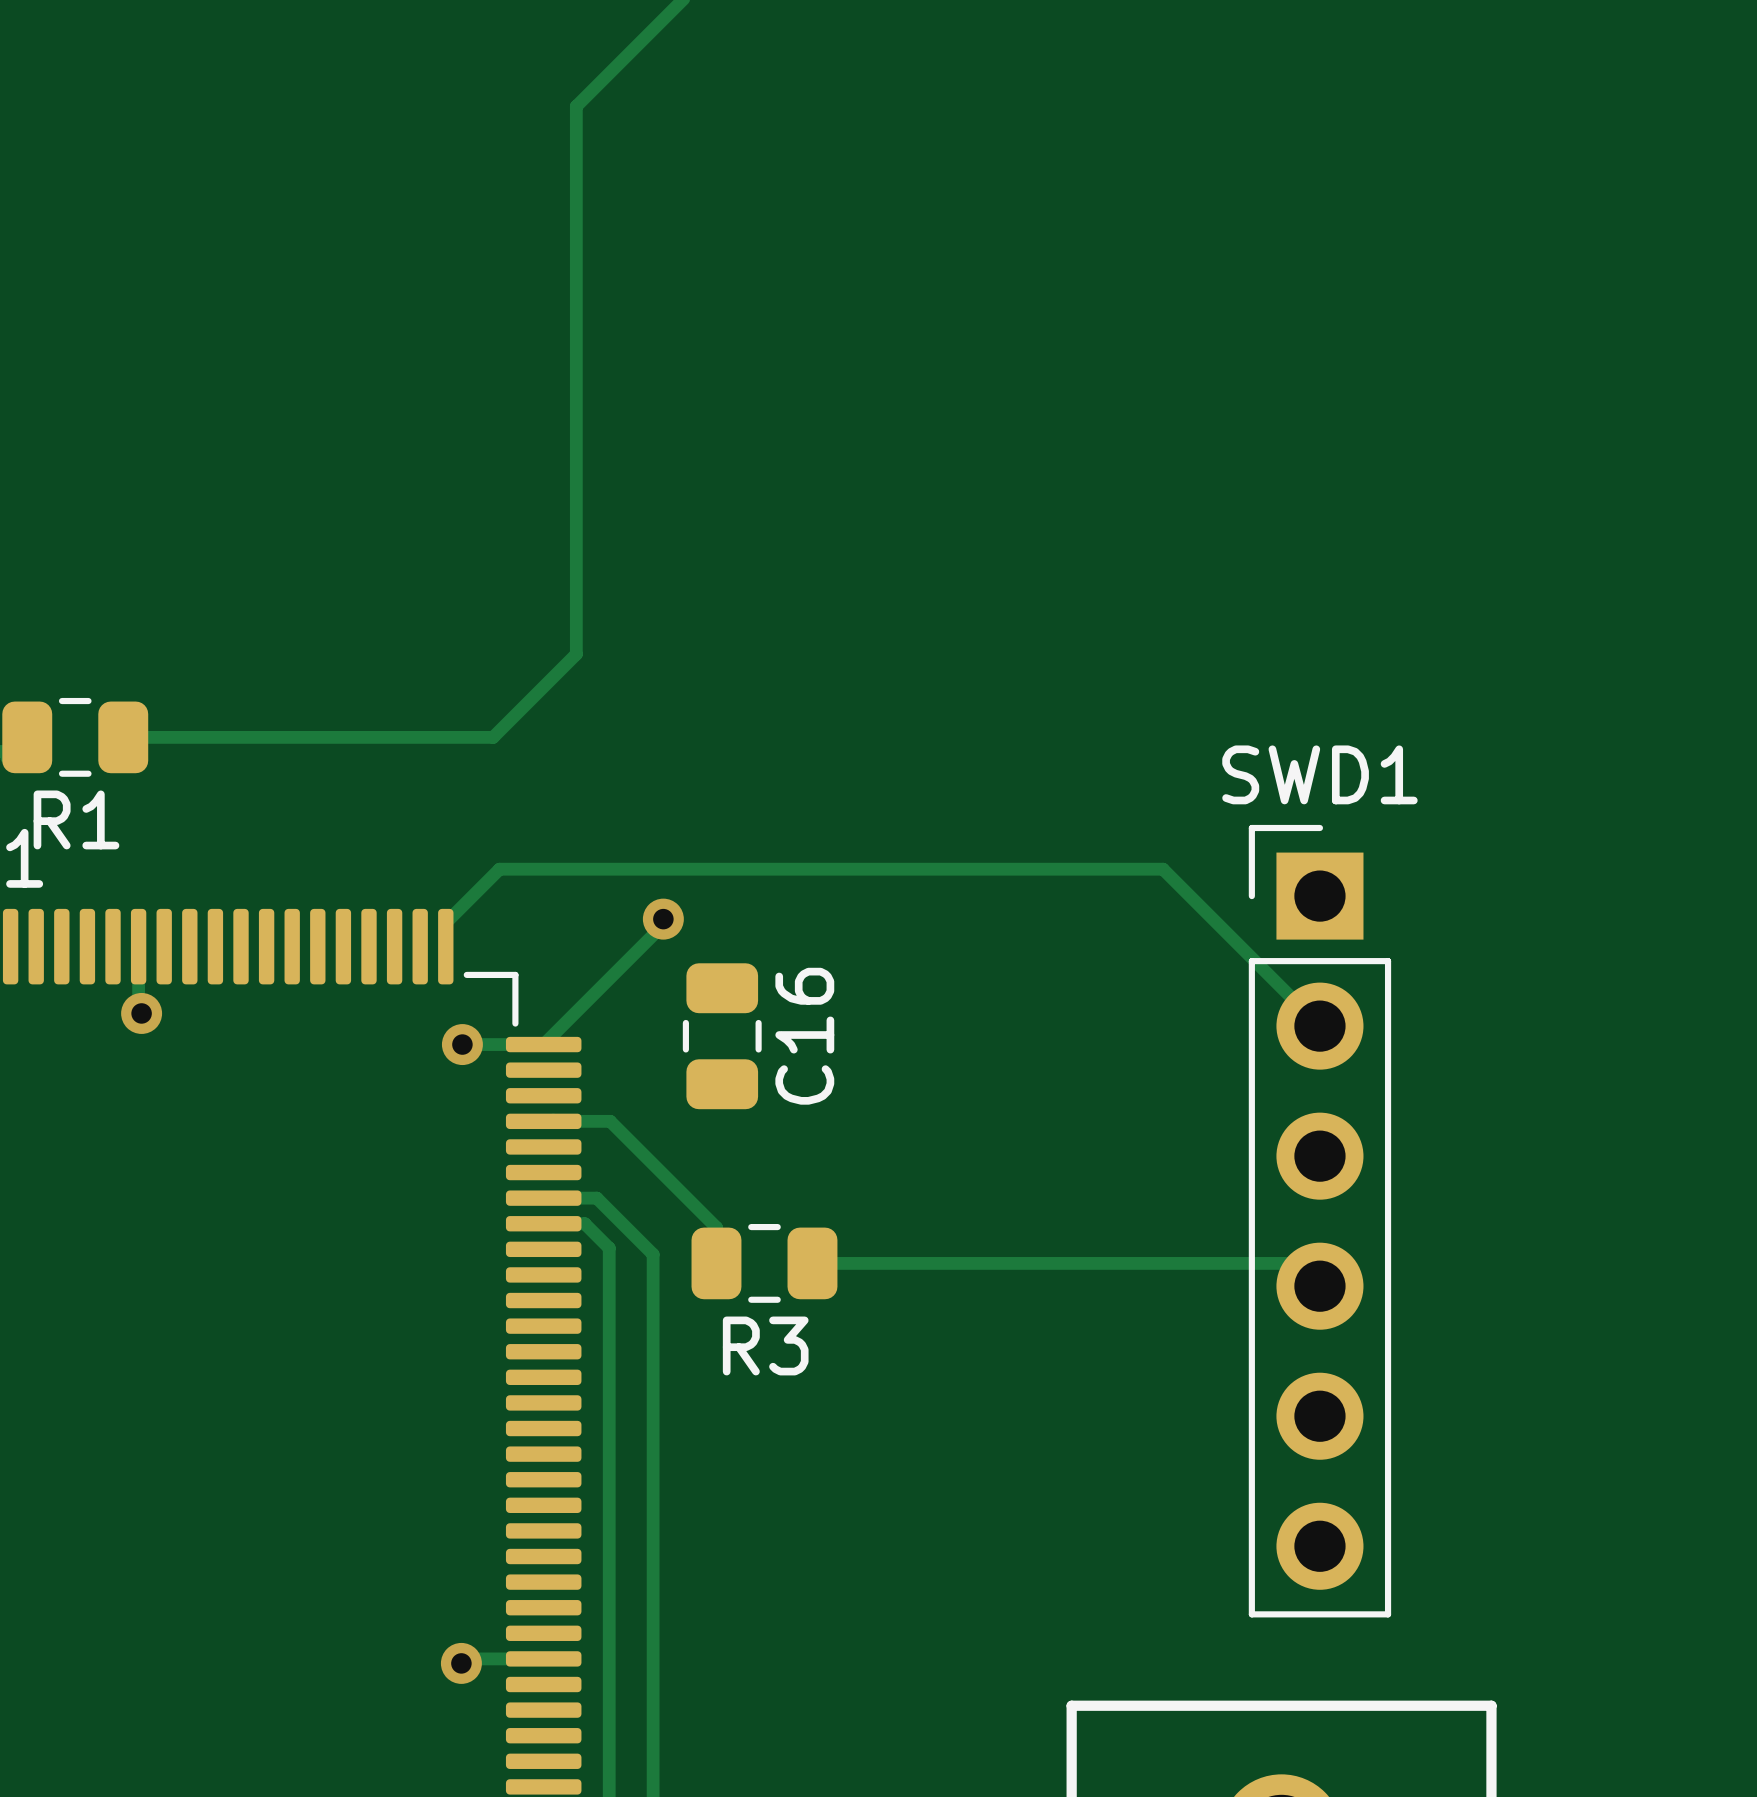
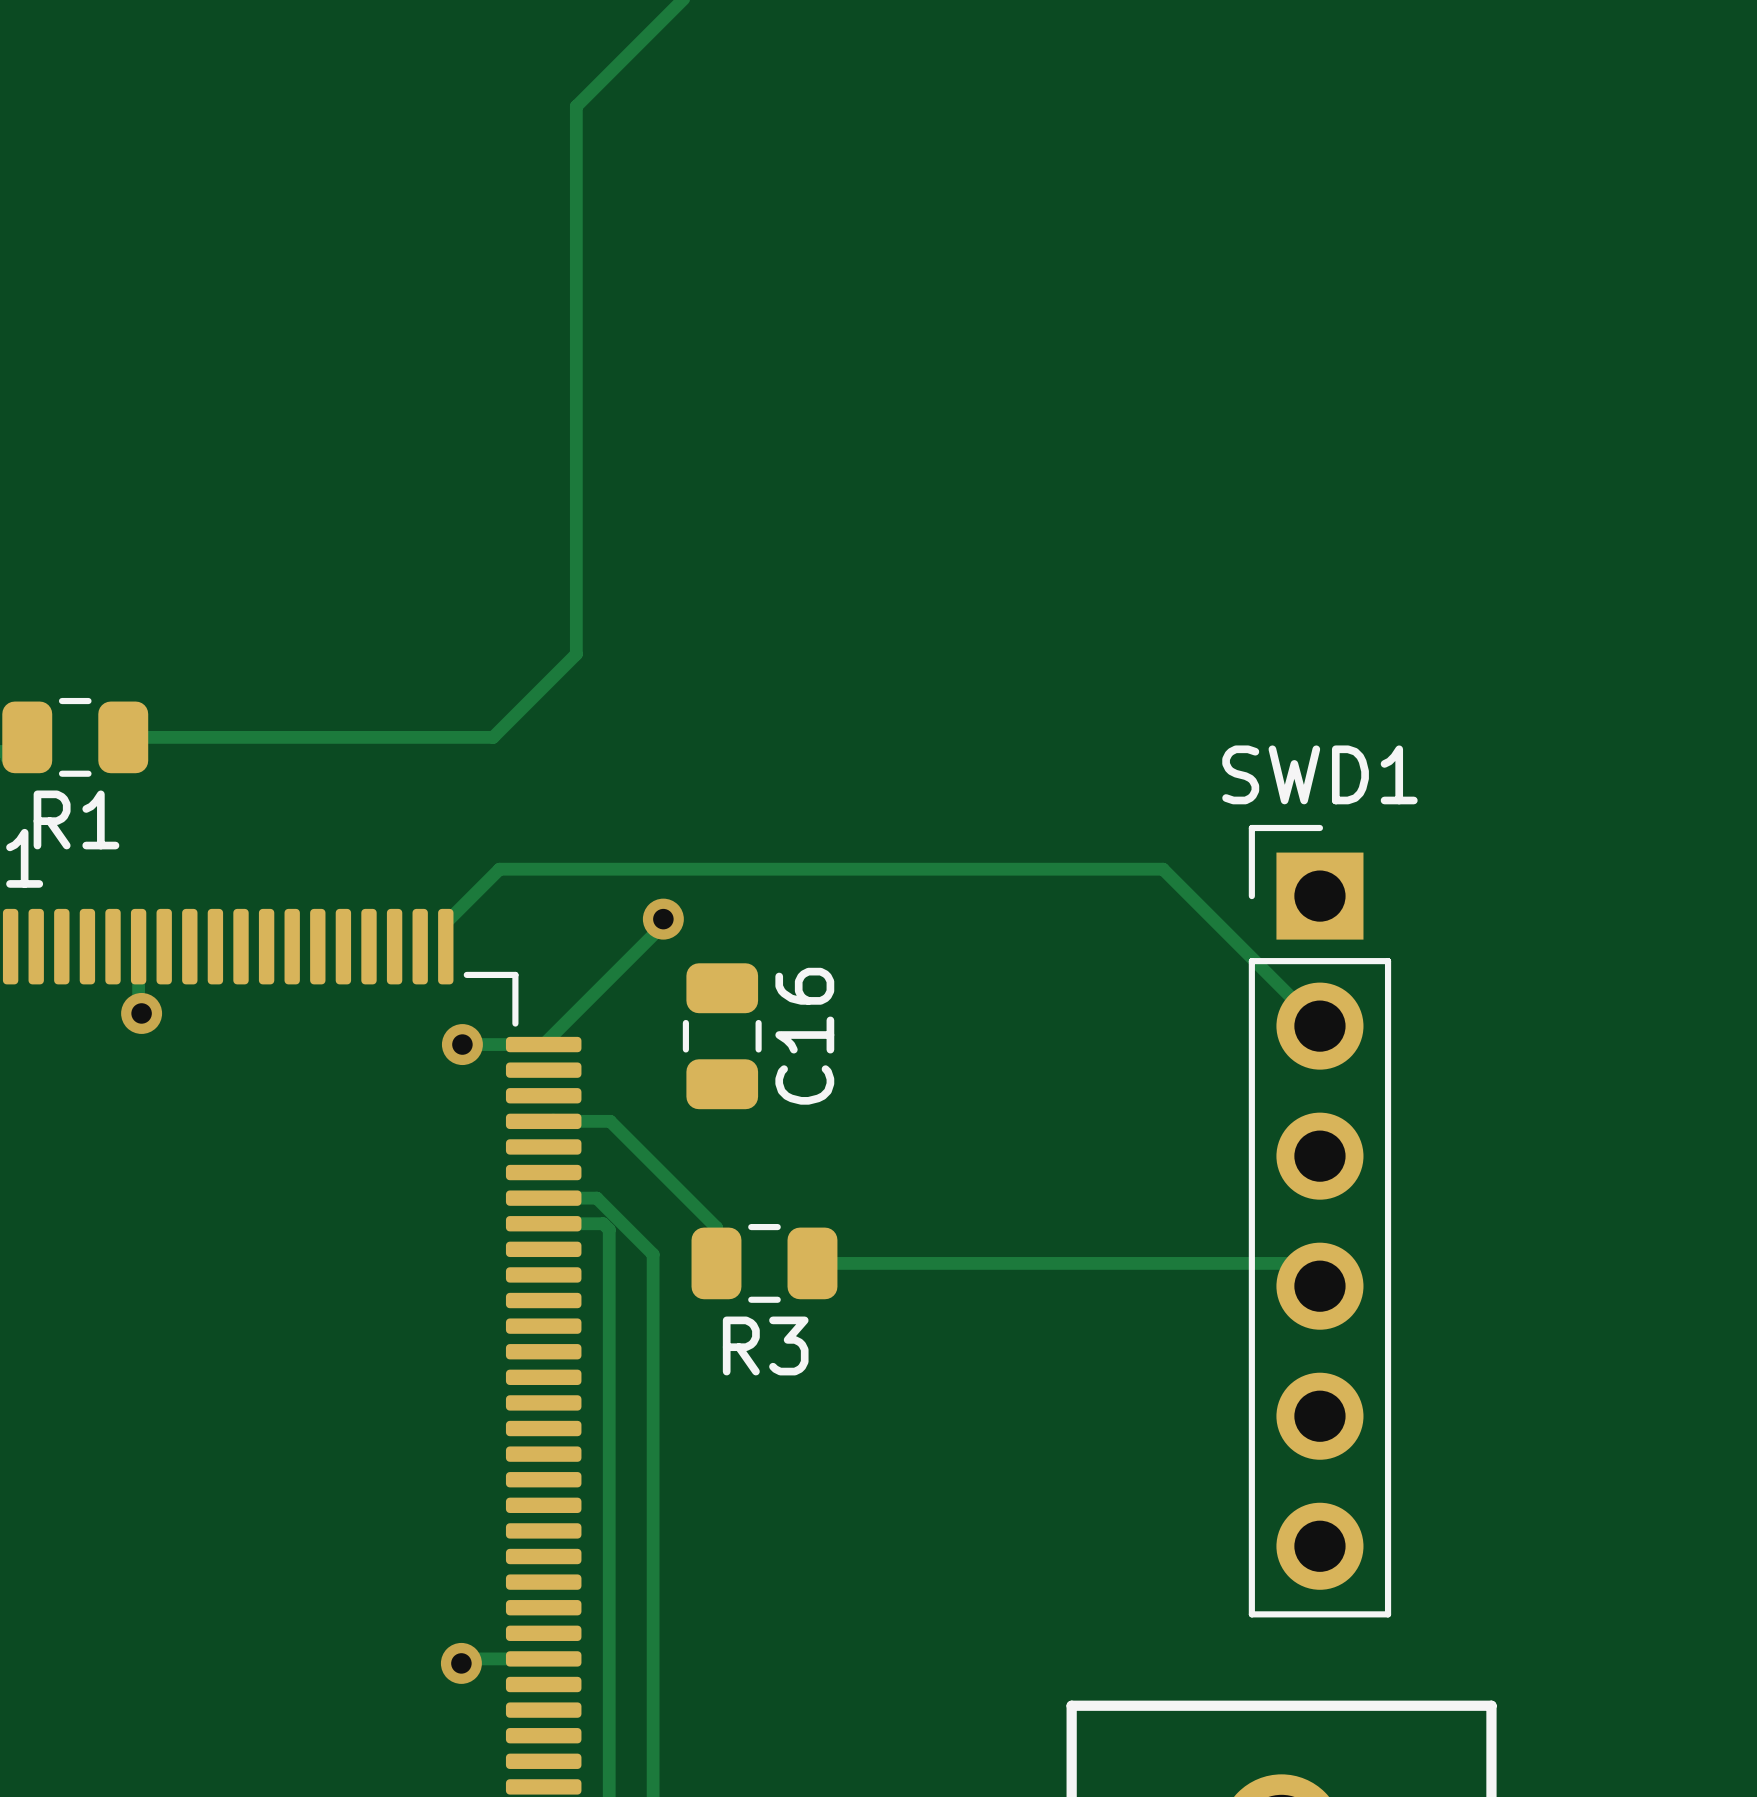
track: (584, 1223) (609, 1248) -> (584, 1223) (603, 1223) (609, 1229) (609, 1248)

